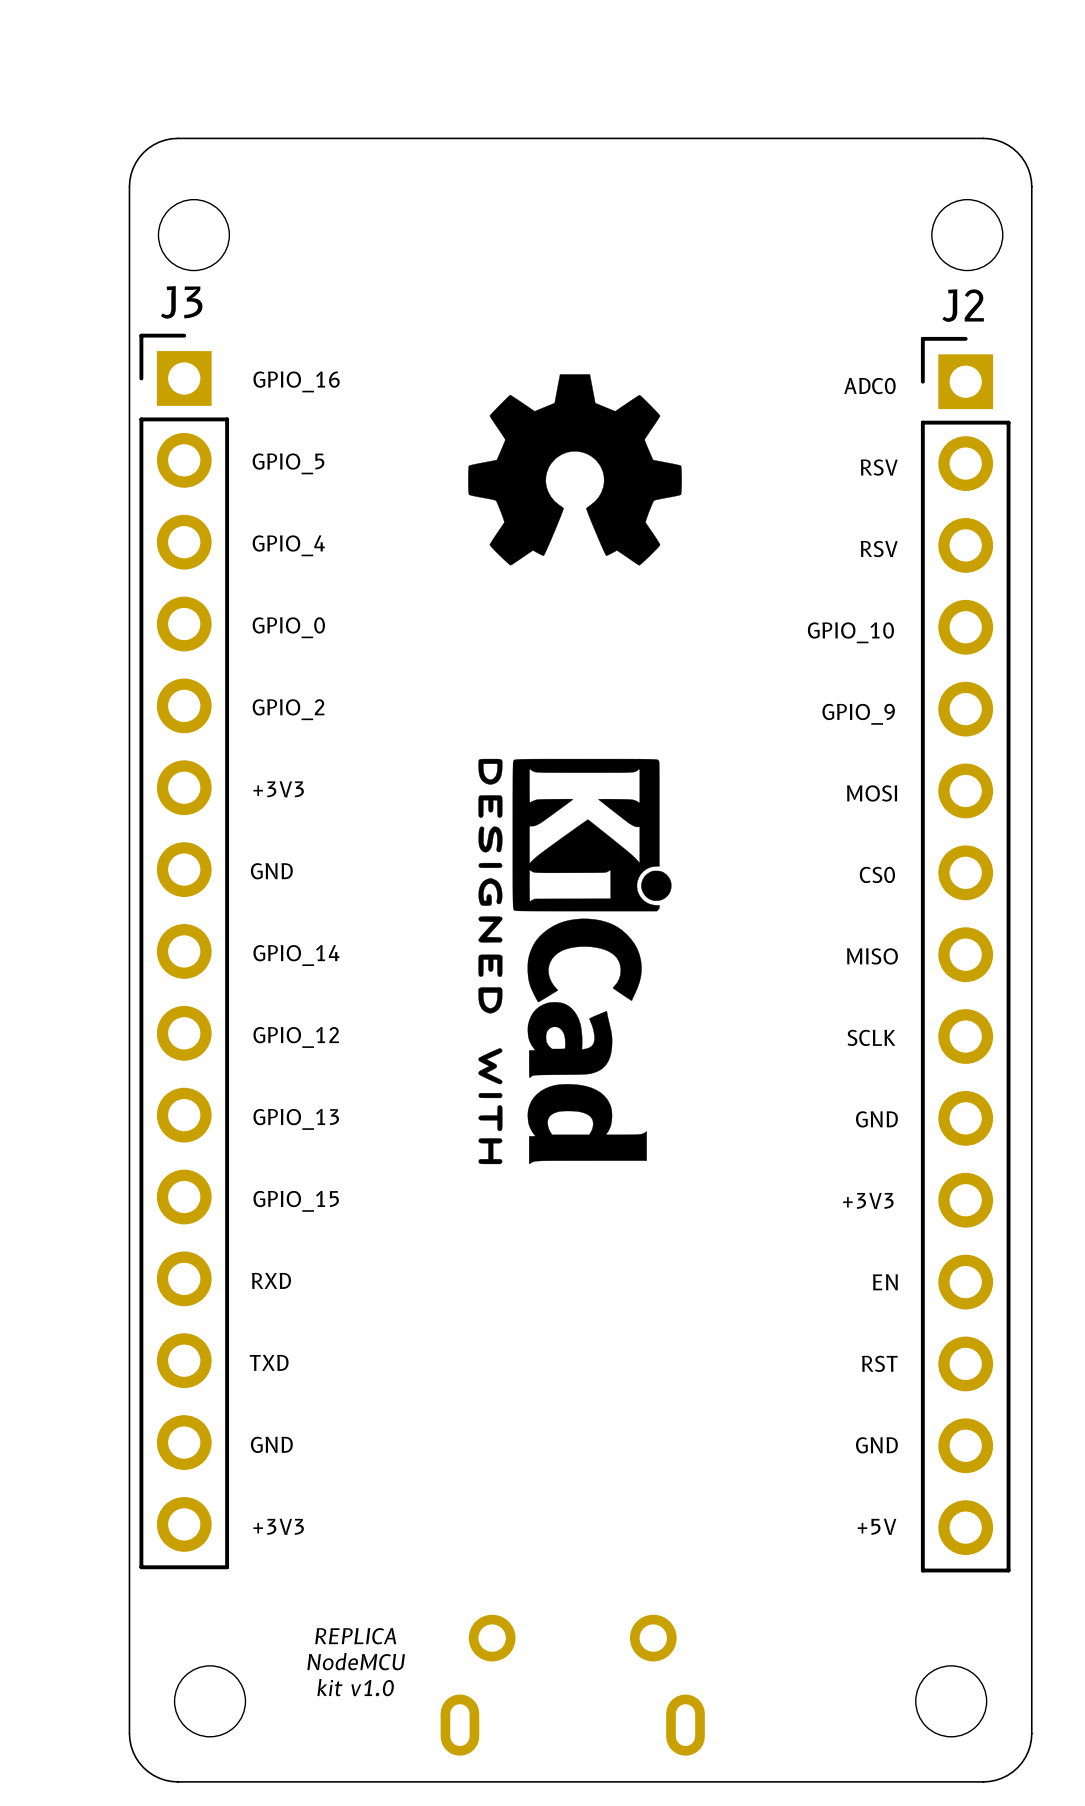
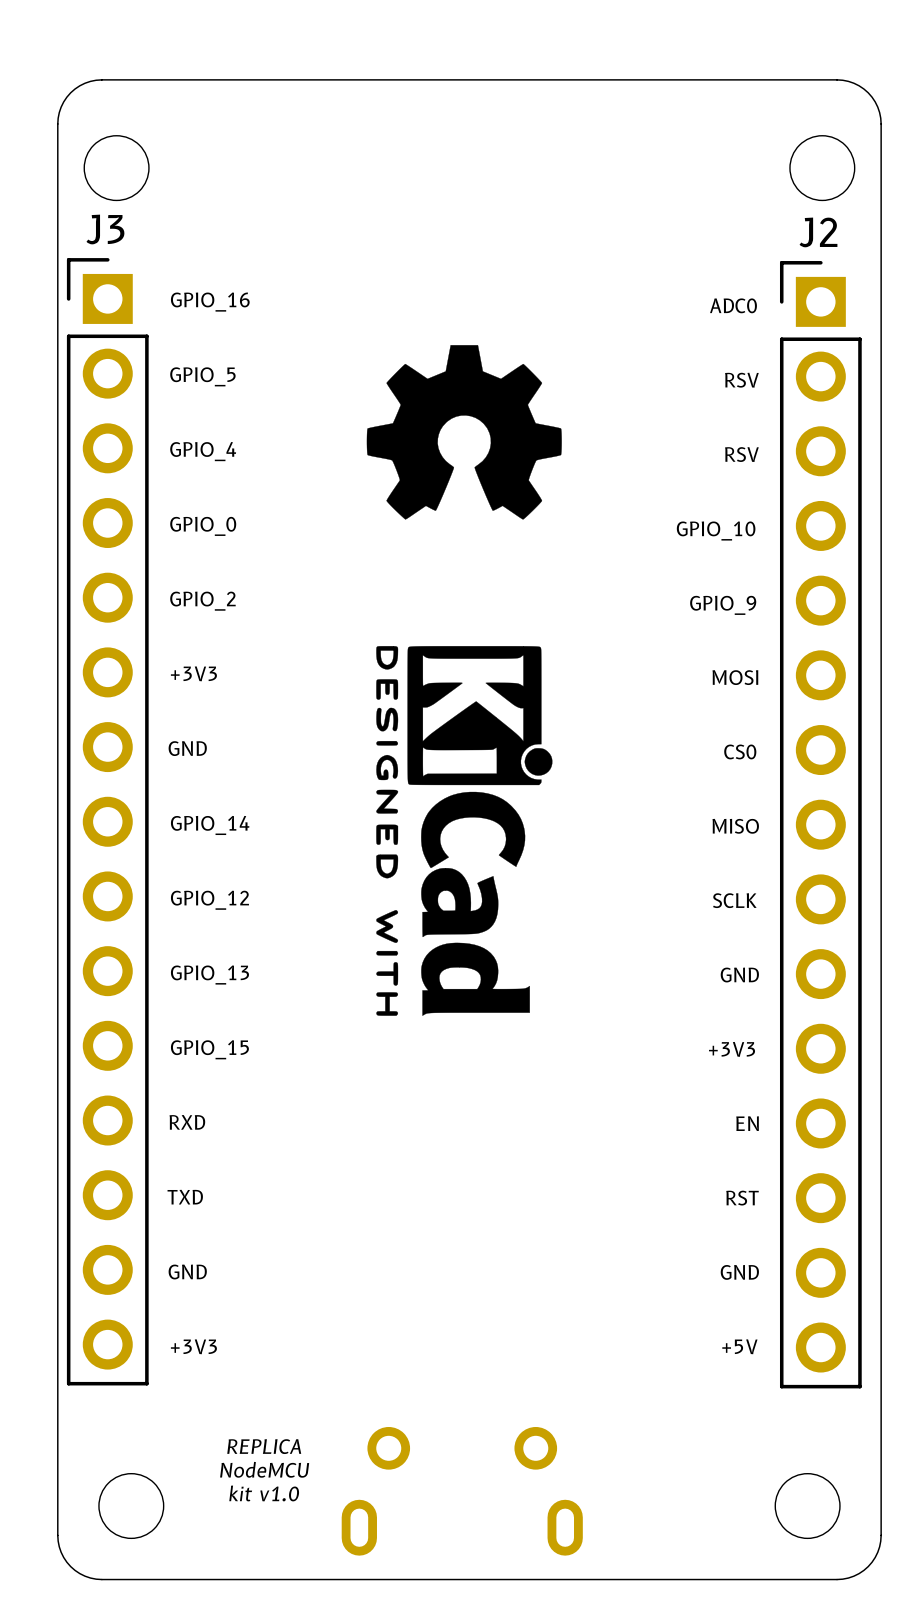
drawing position: (574, 469) -> (464, 432)

